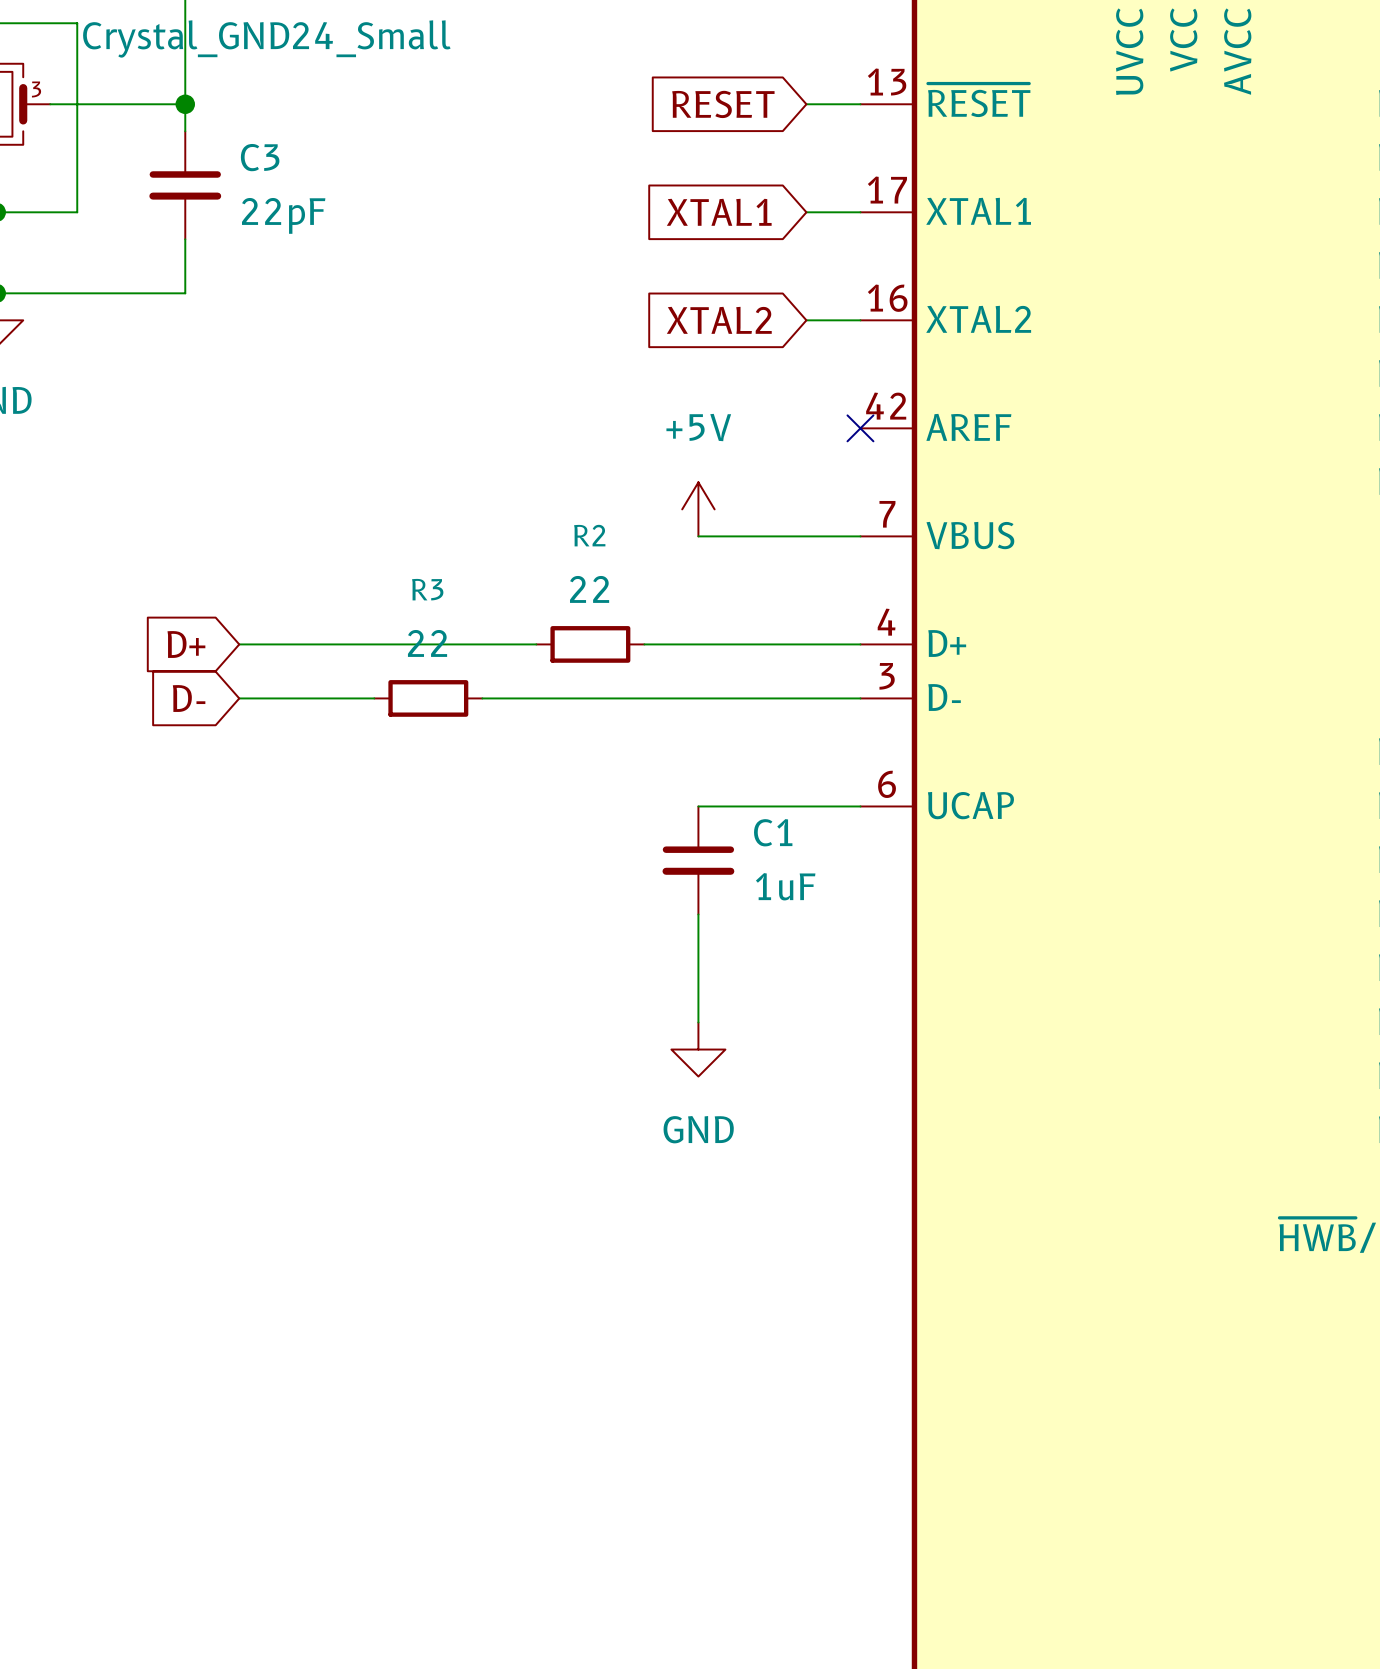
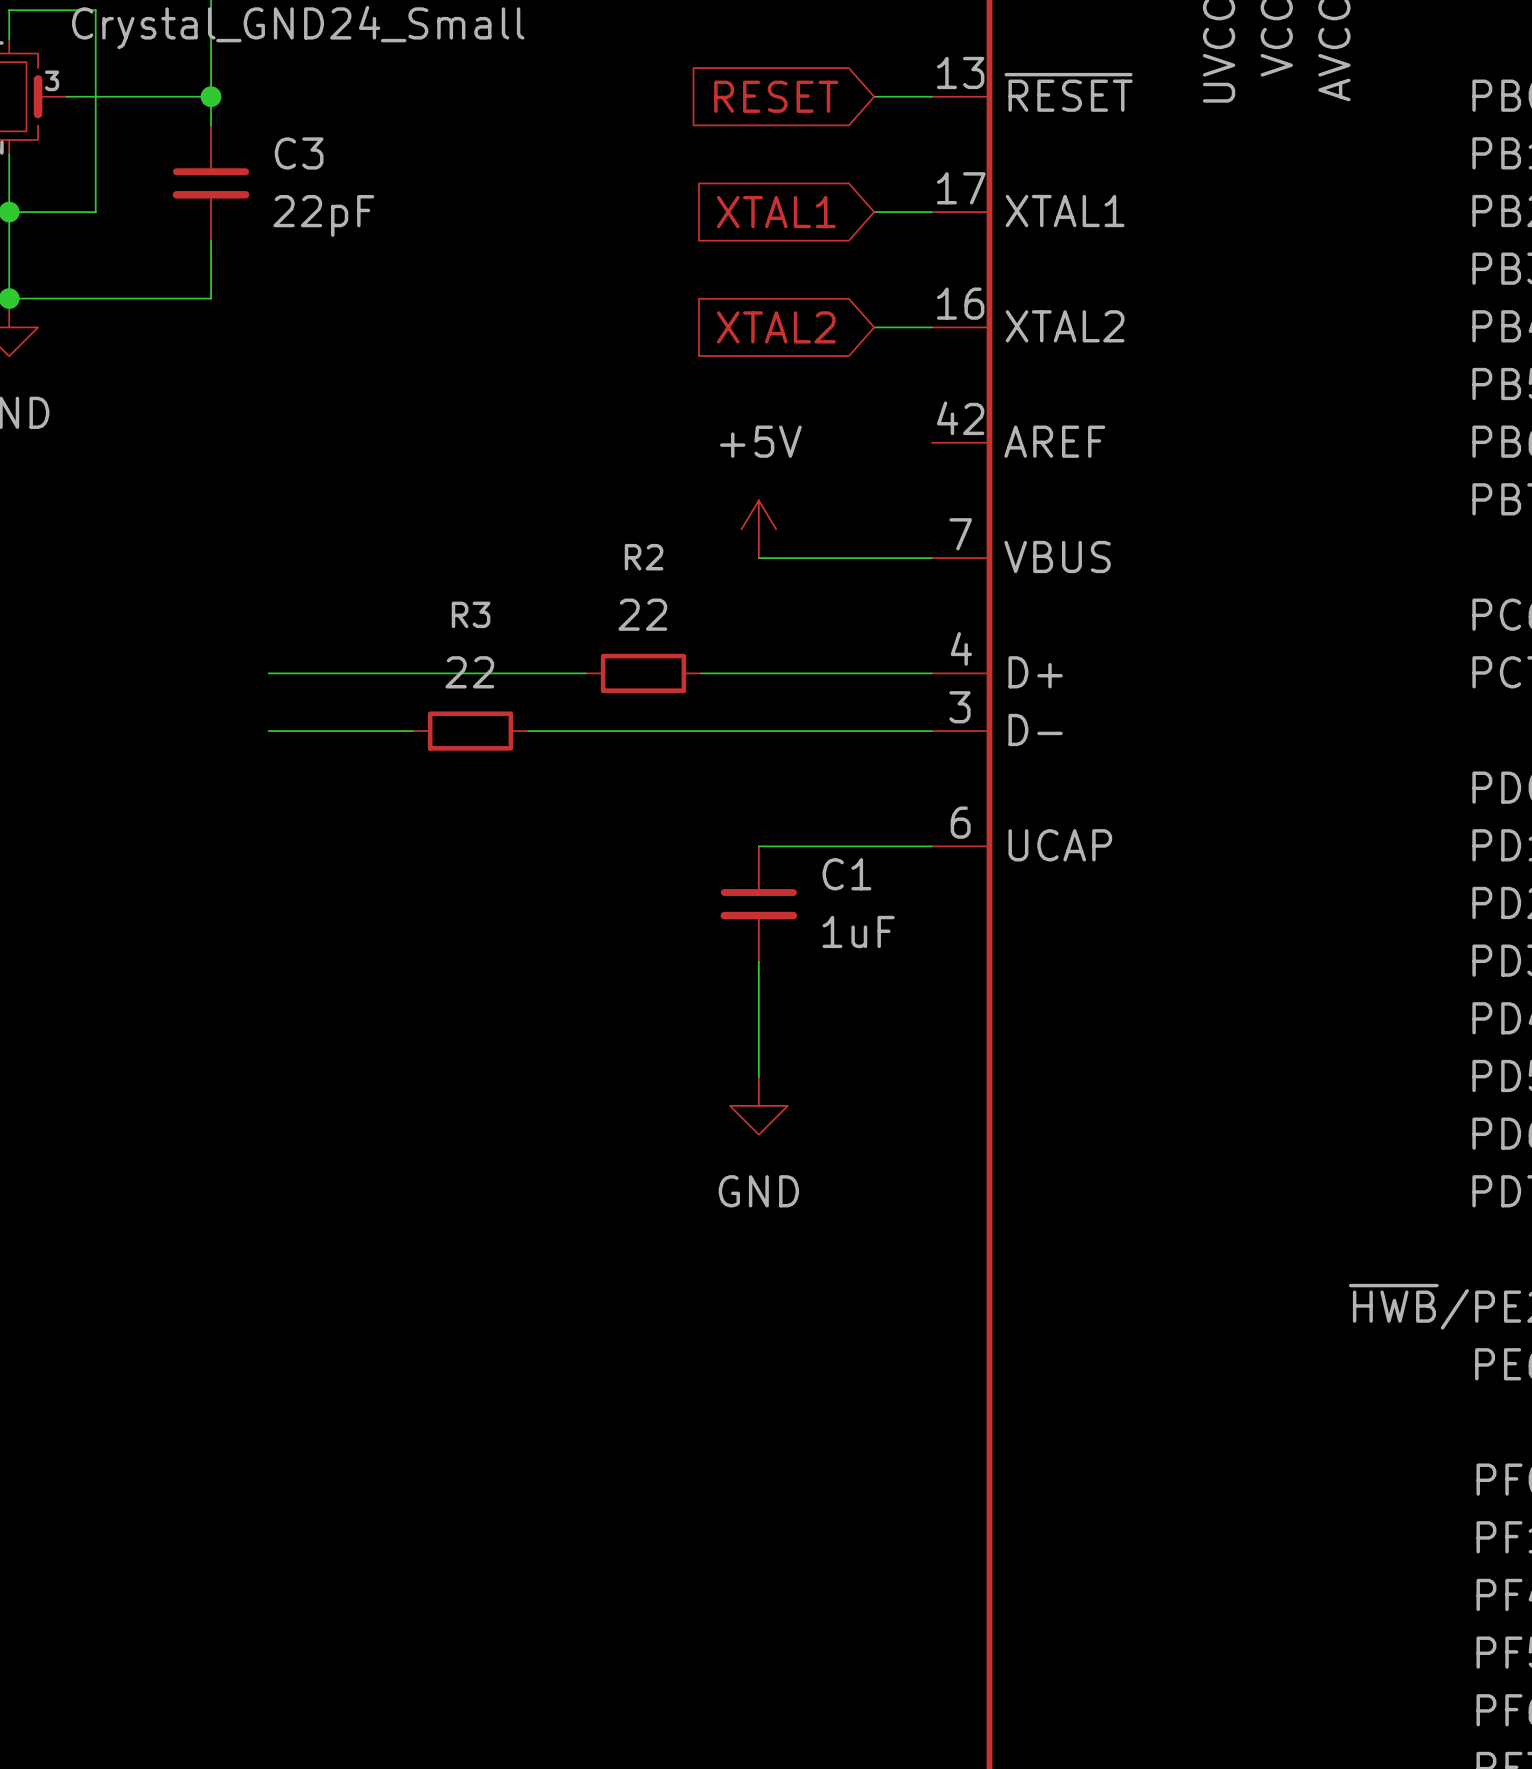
no-connect mark: (860, 428) -> none
global label: D+ (186, 644) -> none
global label: D- (189, 698) -> none

